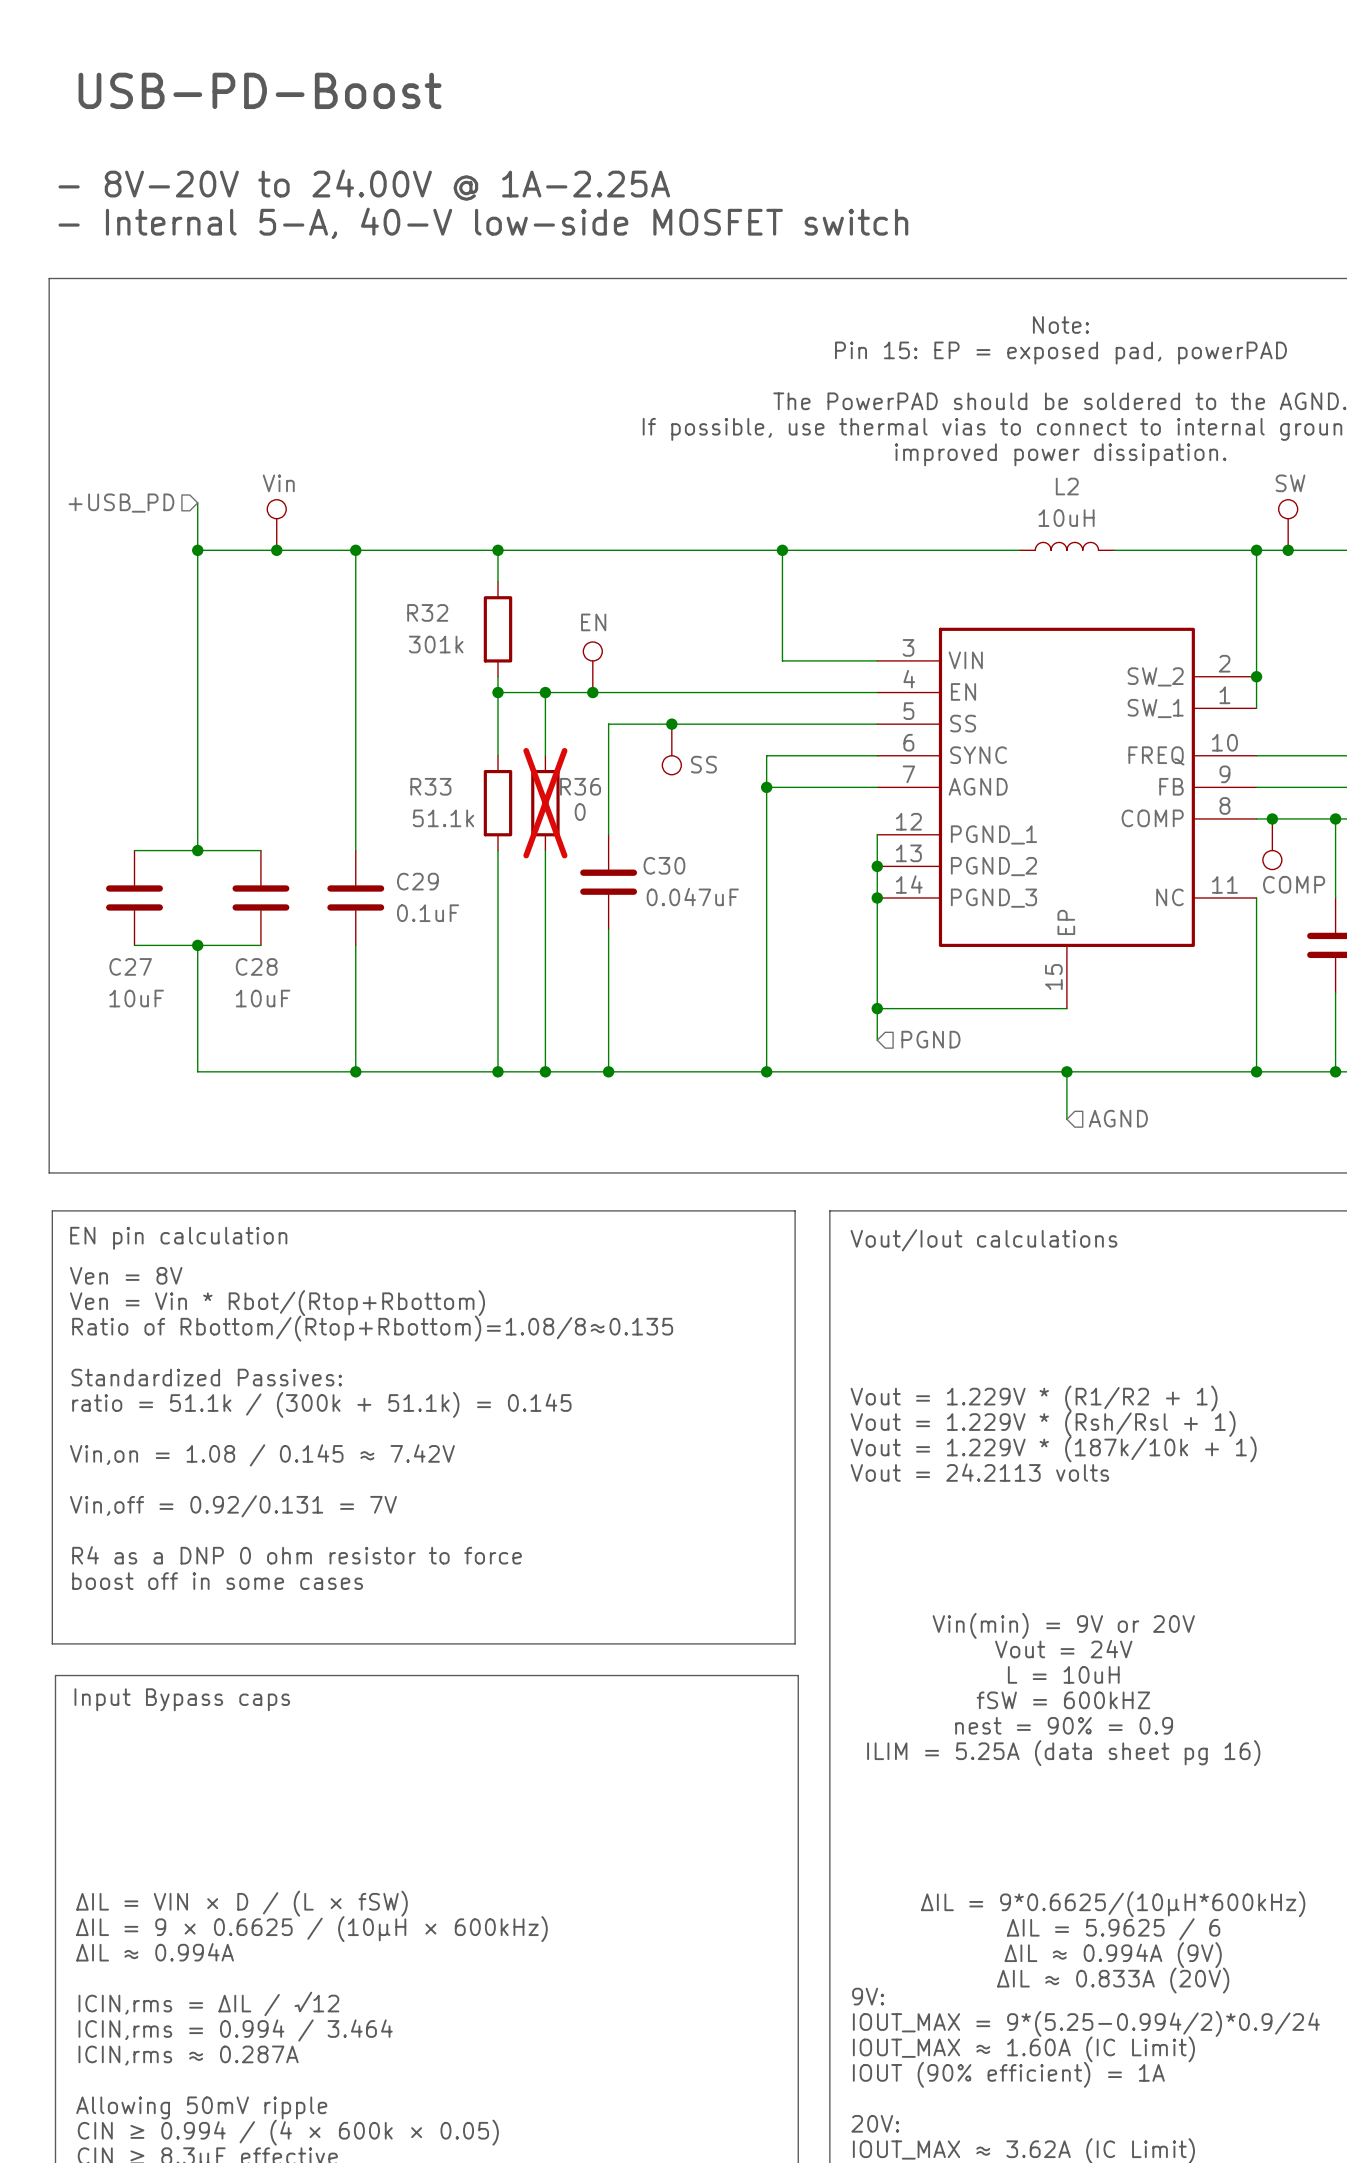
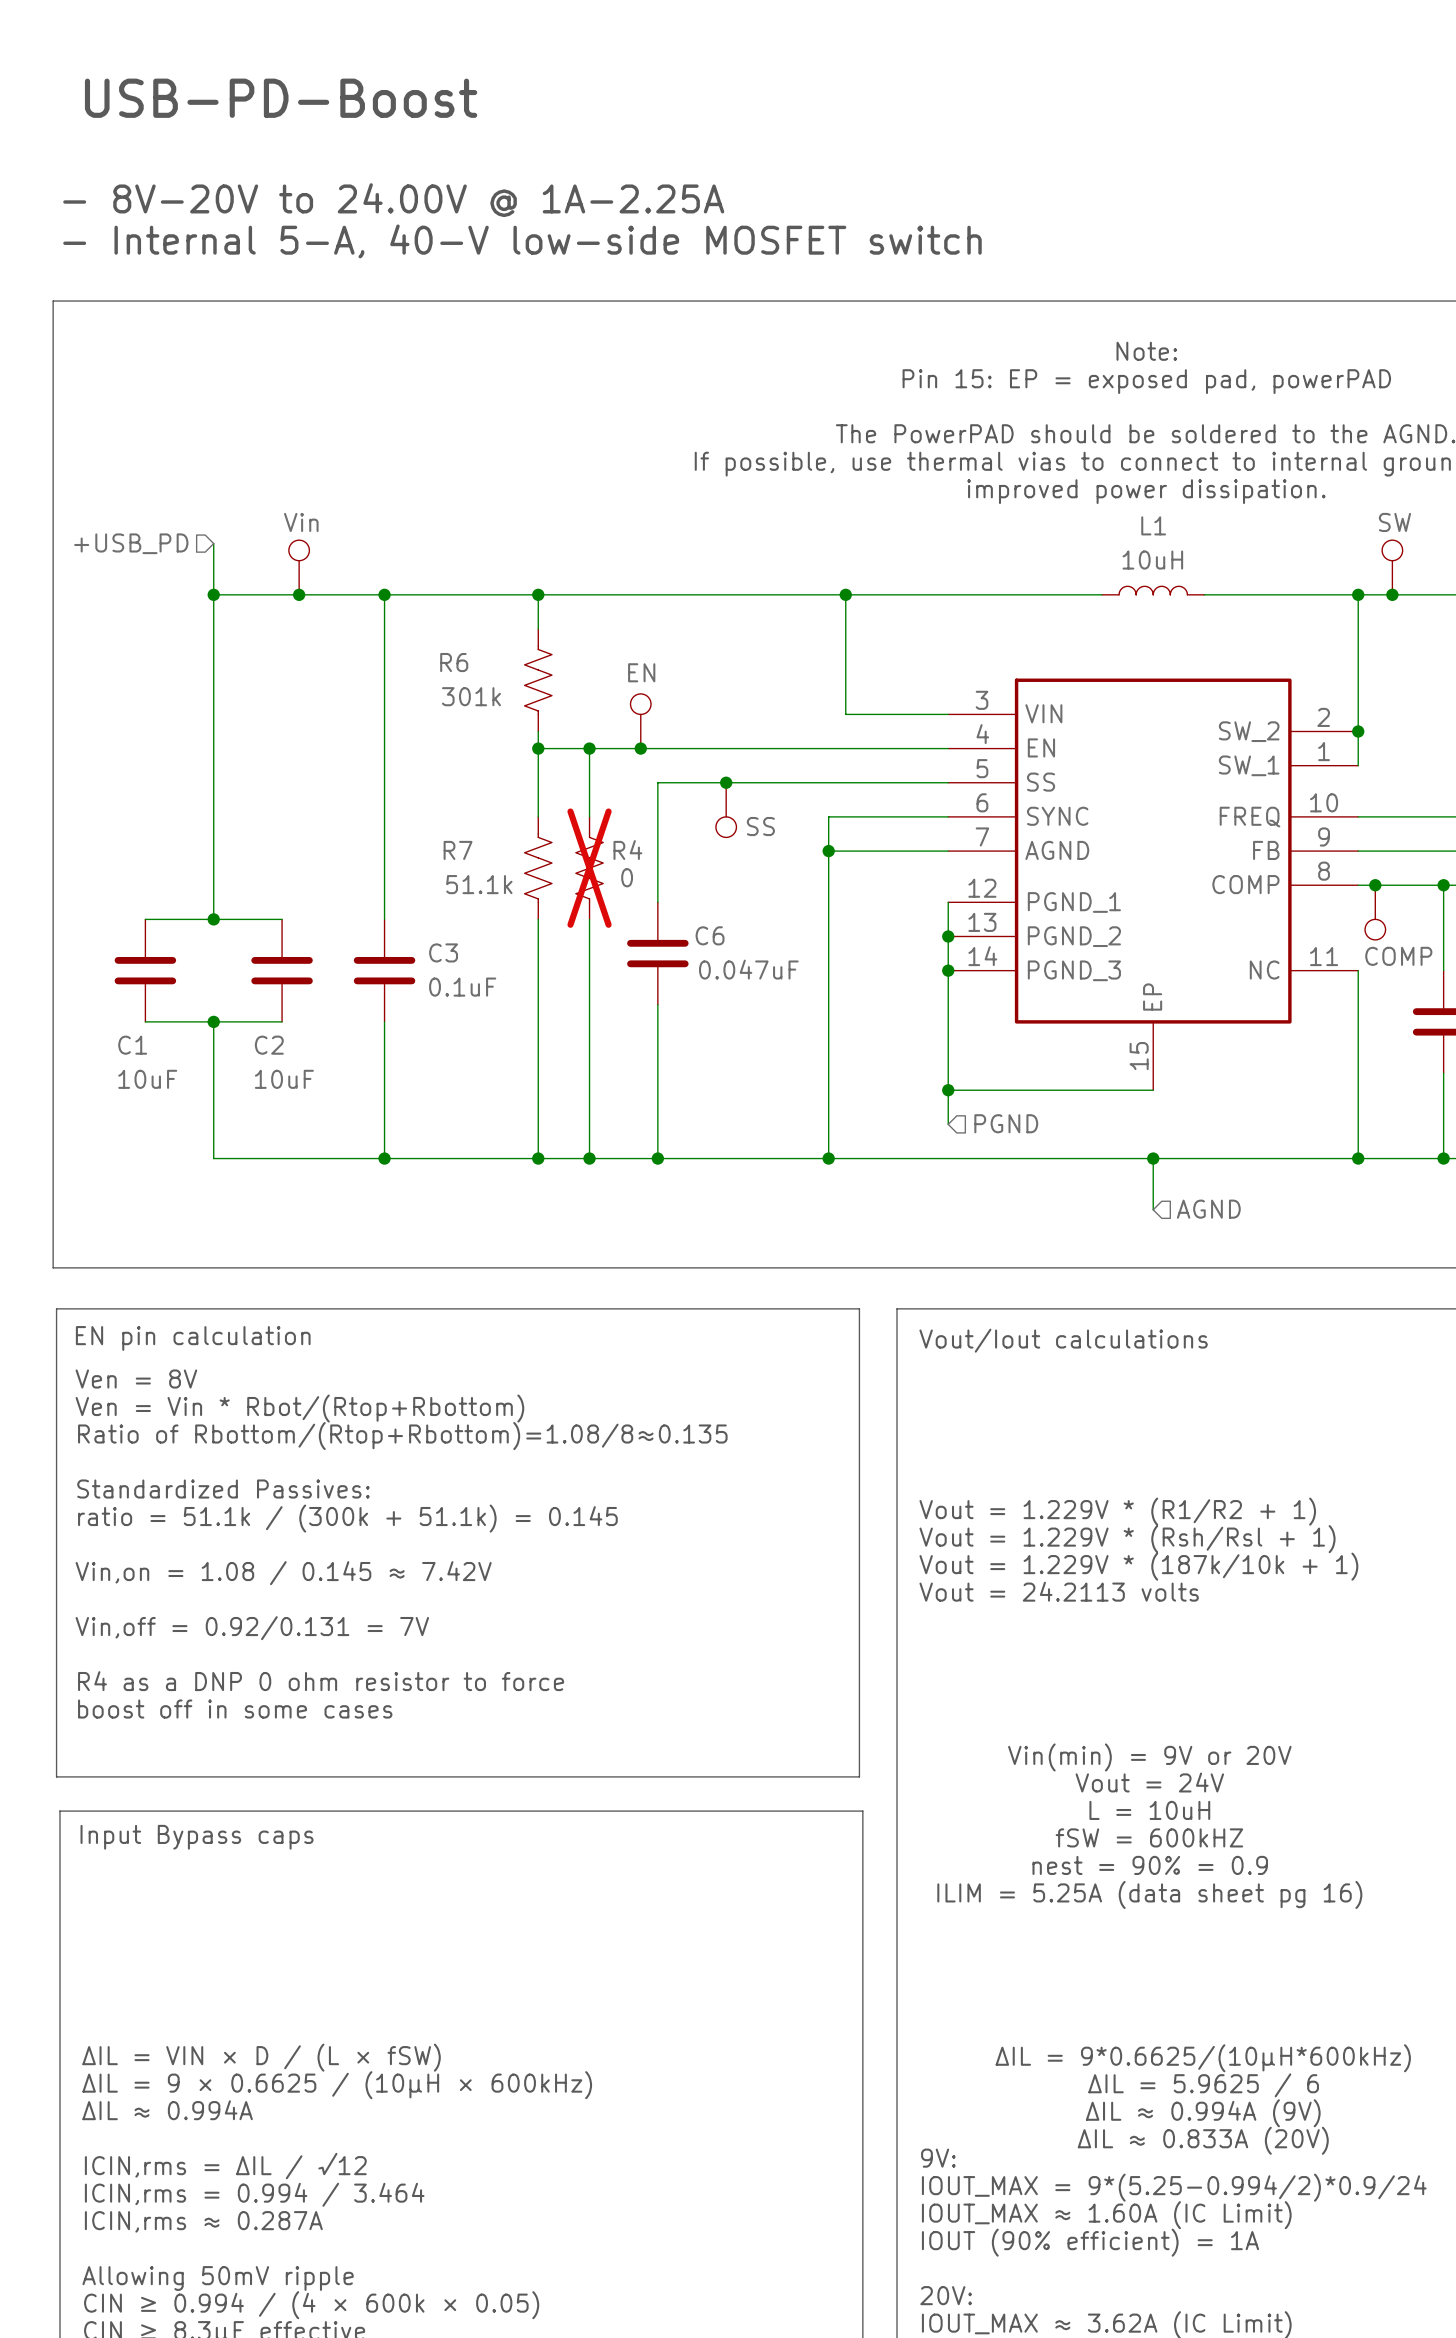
L2 name: L2 (1067, 486) -> L1 (1153, 525)
R32: 301k (497, 629) -> none
R6: none -> 301k (538, 680)
R33: 51.1k (497, 803) -> none
R7: none -> 51.1k (538, 868)
R36: 0 (545, 803) -> none
R4: none -> 0 (589, 868)
C30 name: C30 (664, 865) -> C6 (710, 935)
C29 name: C29 (417, 881) -> C3 (443, 952)
C27 name: C27 (130, 966) -> C1 (132, 1045)
C28 name: C28 (256, 966) -> C2 (269, 1045)

